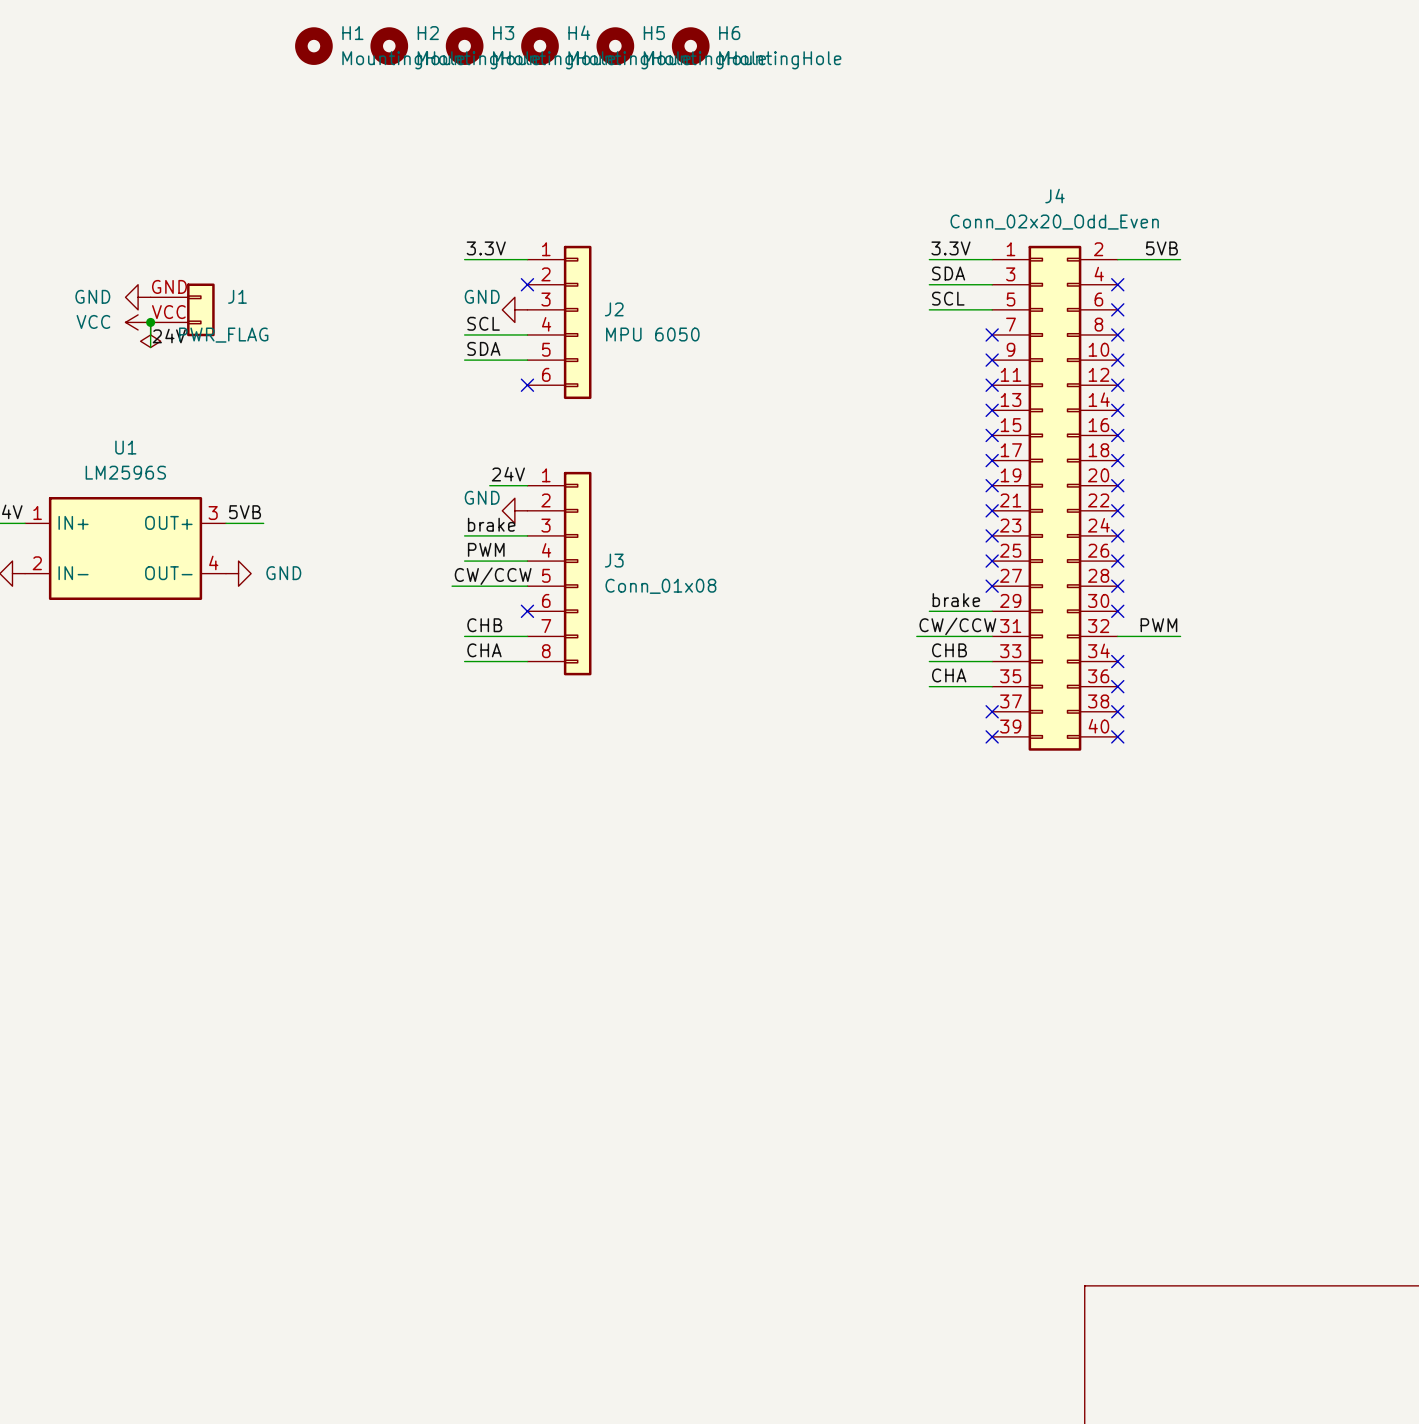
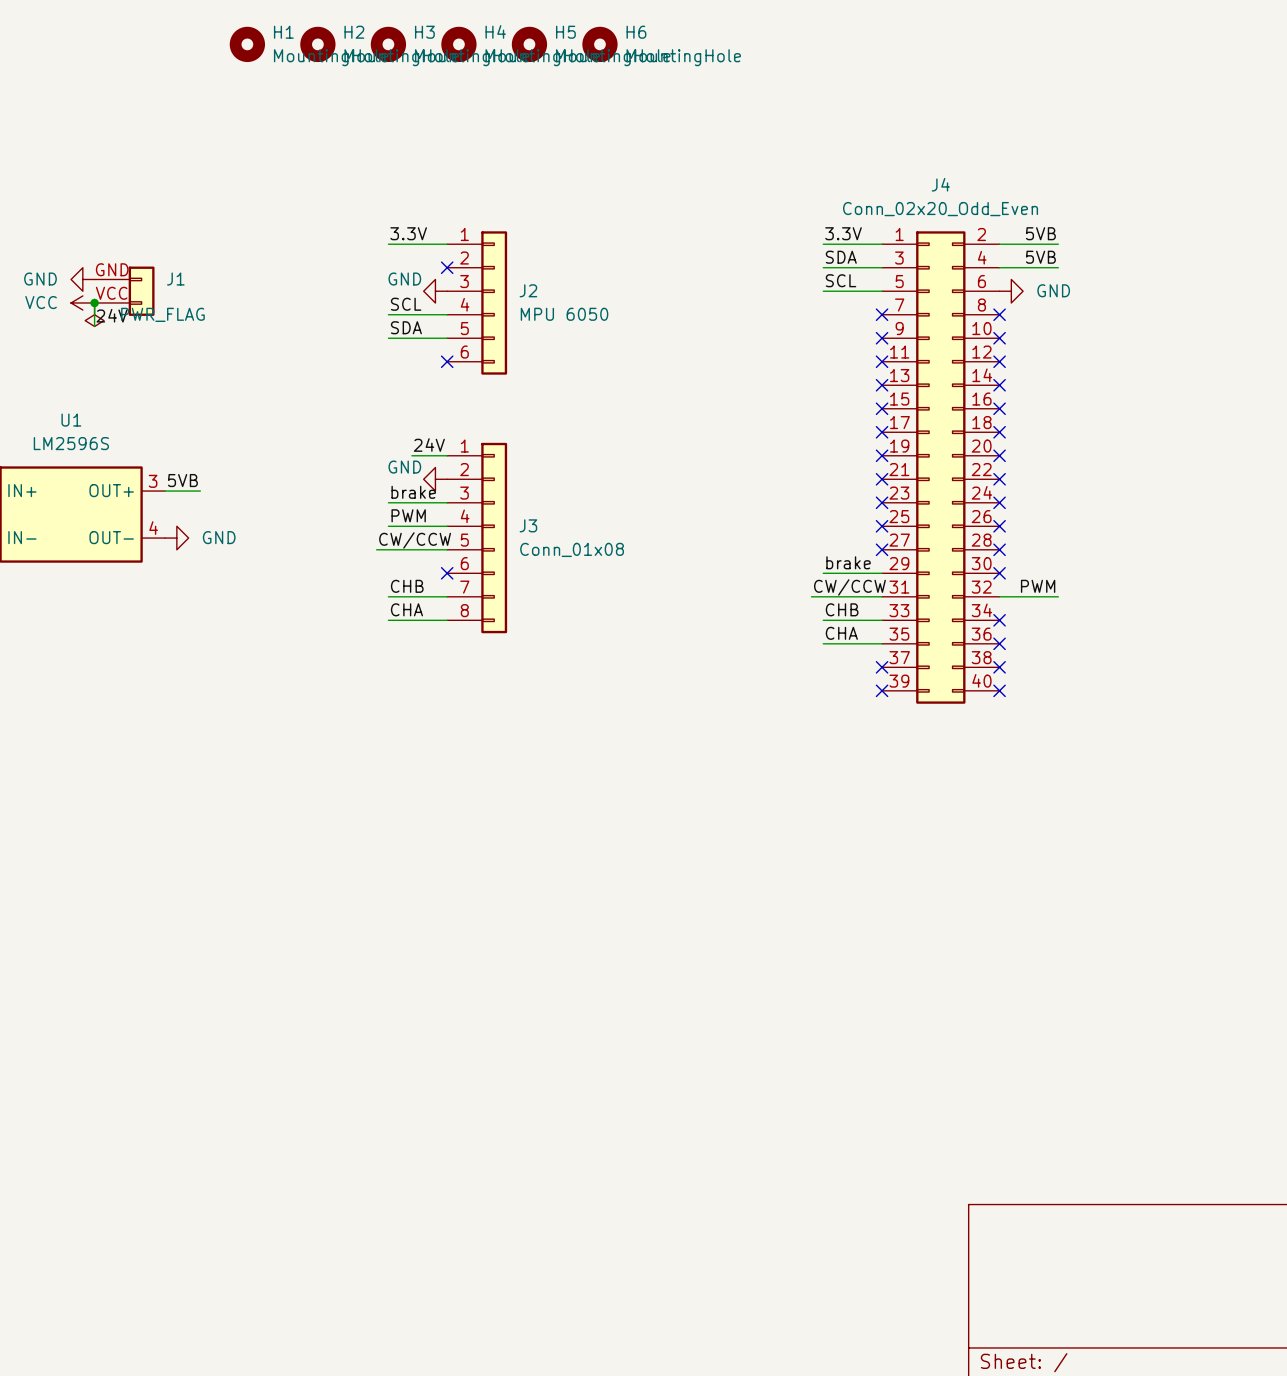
label: none -> 5VB (1040, 257)
wire: none -> (999, 267) (1058, 267)
no-connect mark: (1117, 284) -> none
no-connect mark: (1117, 309) -> none
power symbol: none -> GND (1011, 291)

